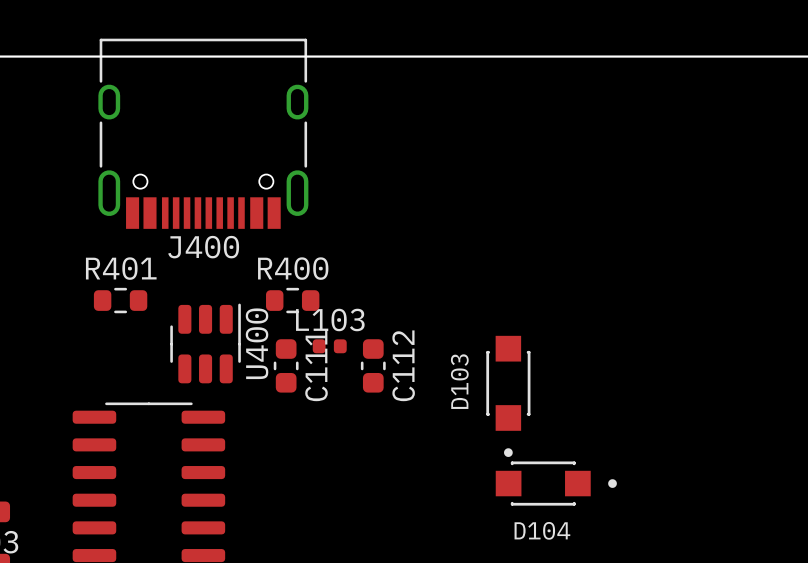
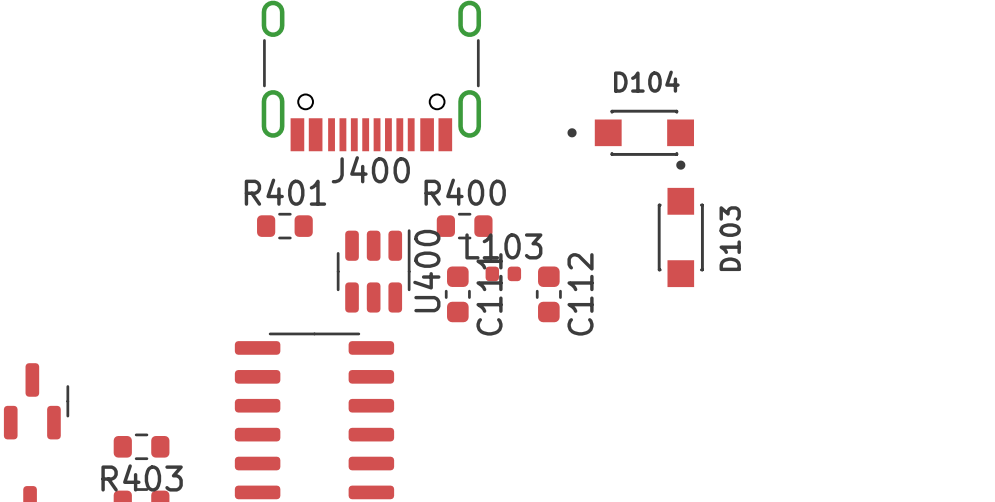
D103 rotation: 0° (508, 396) -> 180° (680, 223)
D103 position: (508, 396) -> (680, 223)
D104 rotation: 0° (556, 483) -> 180° (630, 132)
D104 position: (556, 483) -> (630, 132)

